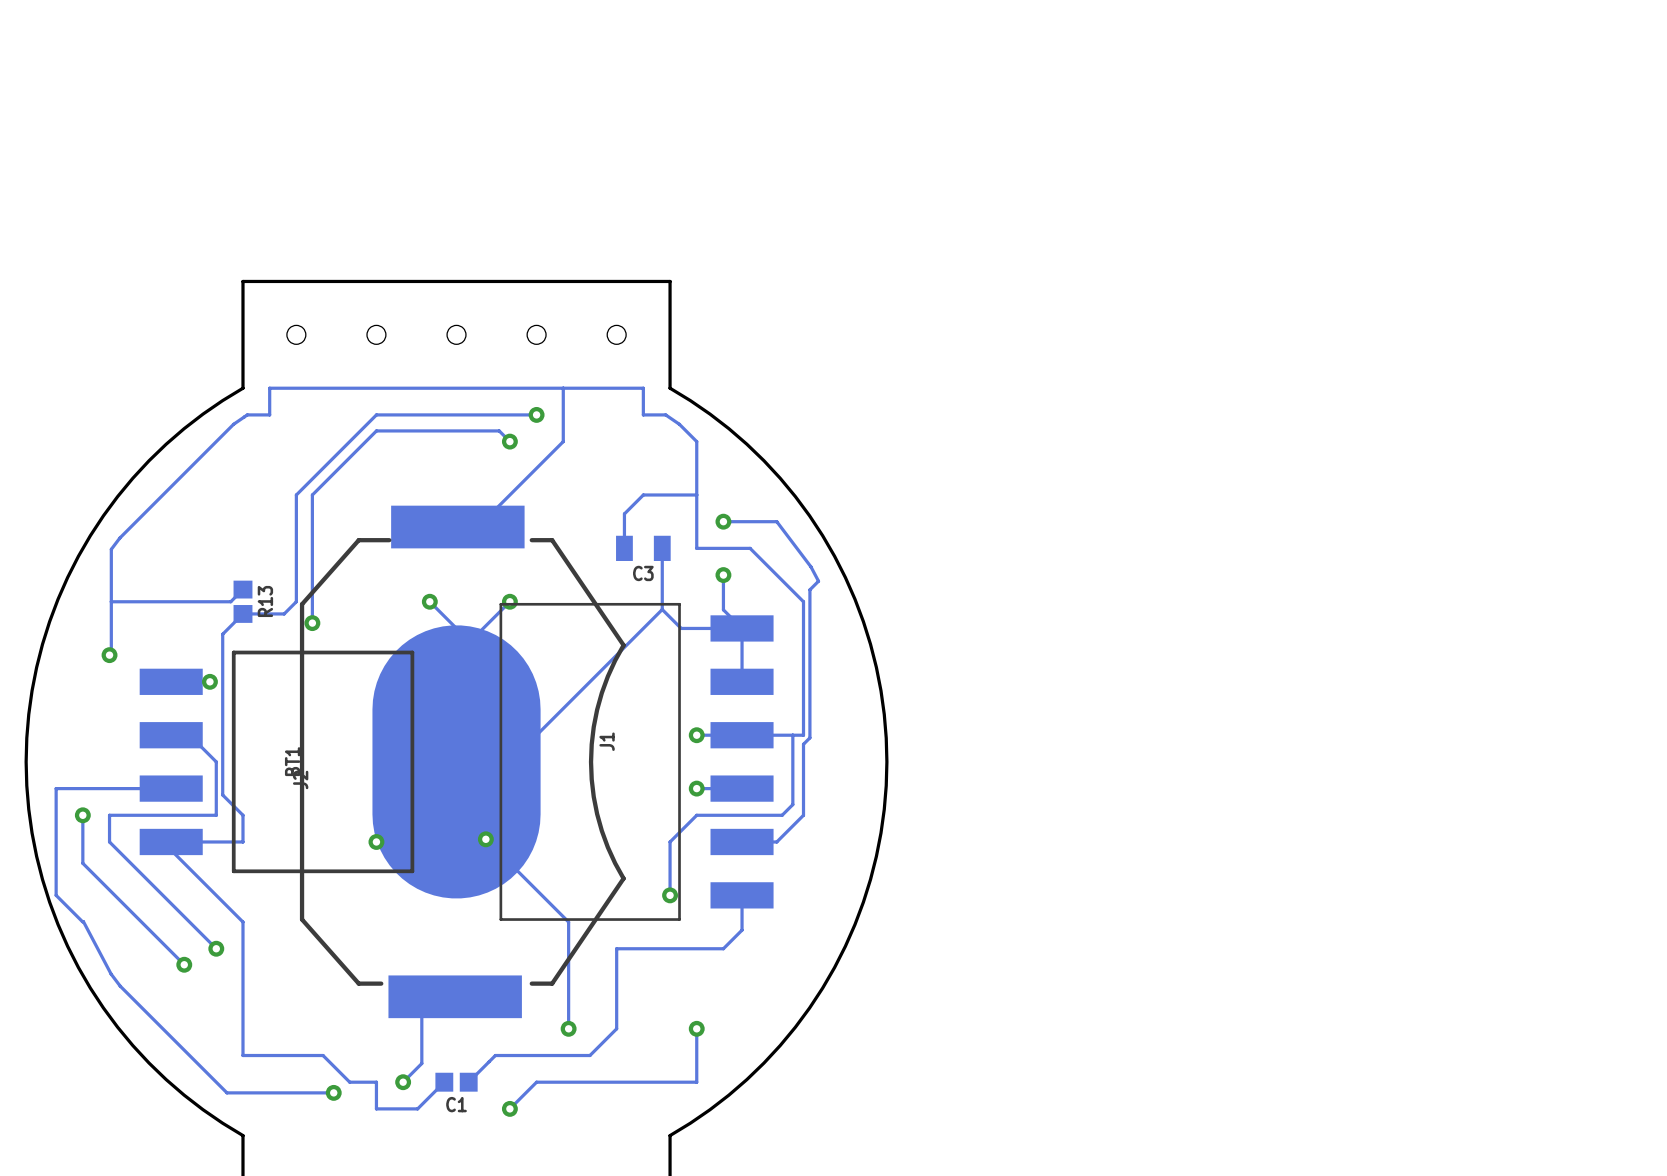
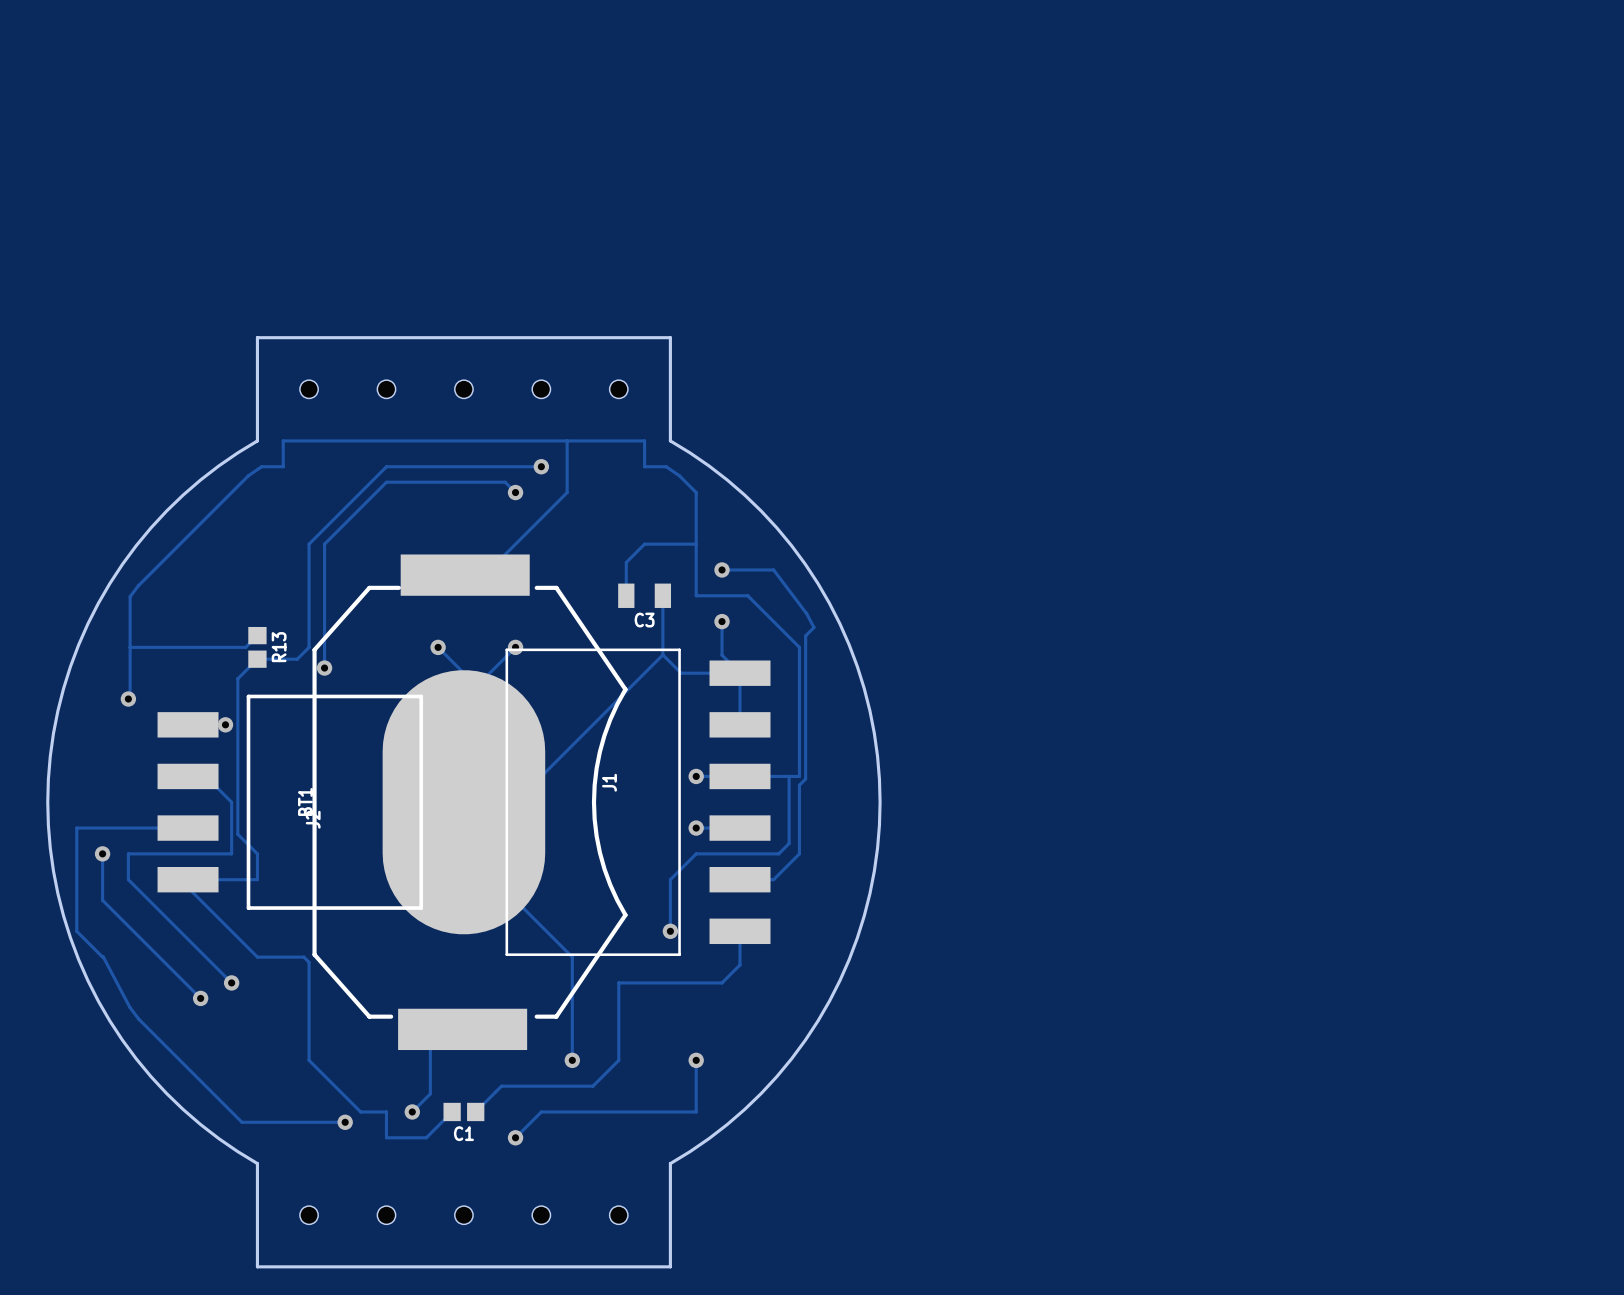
via: (485, 839) -> none
via: (376, 841) -> none
track: (242, 922) (242, 1055) (323, 1055) -> (257, 957) (303, 957) (309, 962) (309, 1060) (334, 1086)

